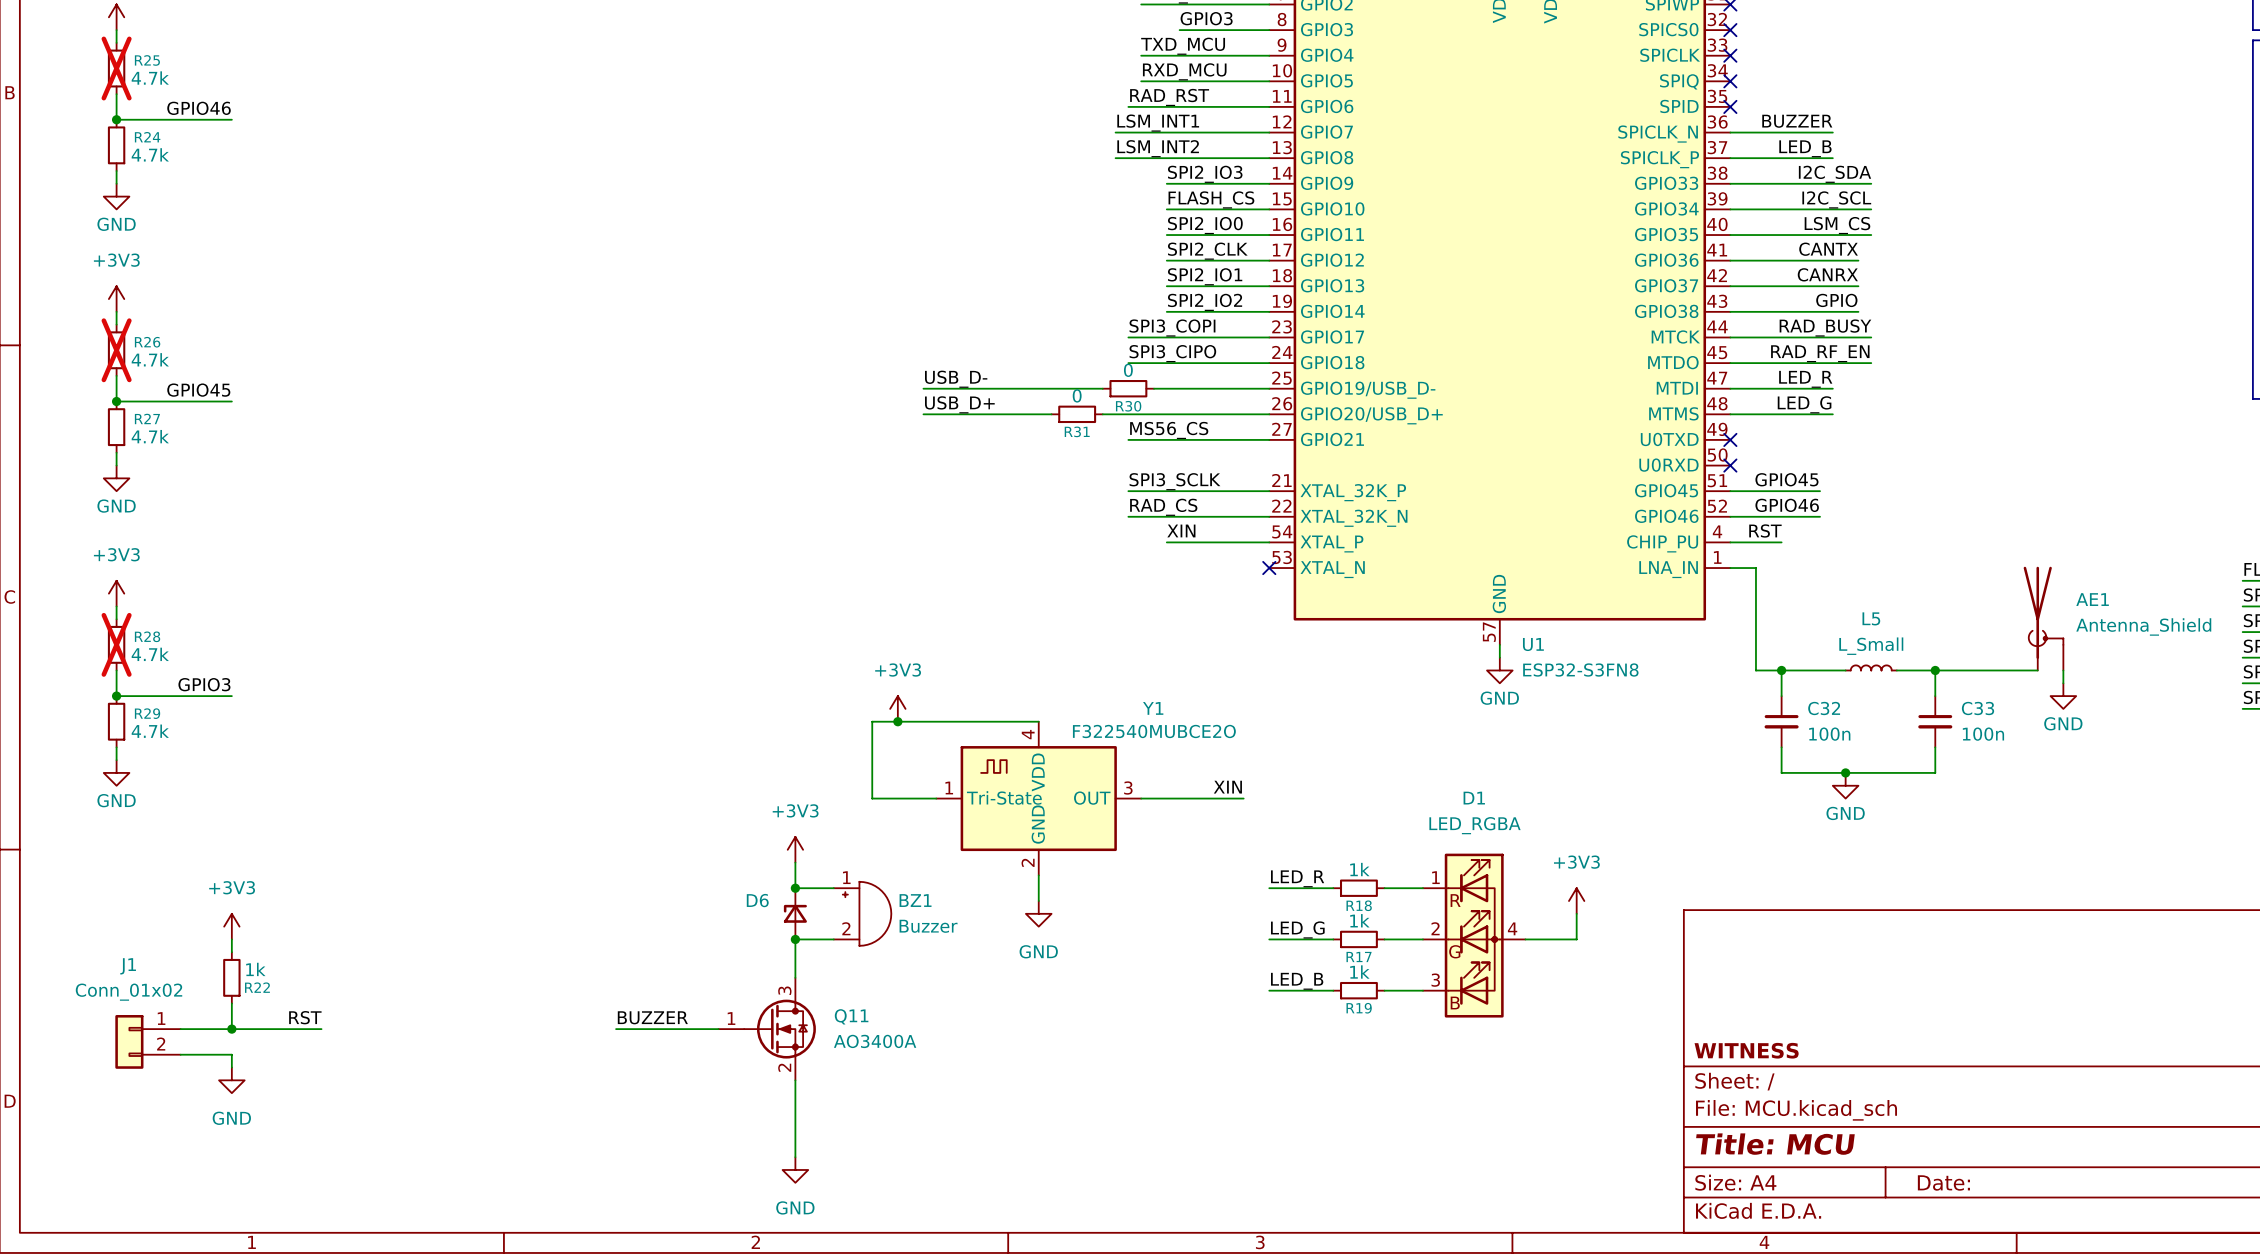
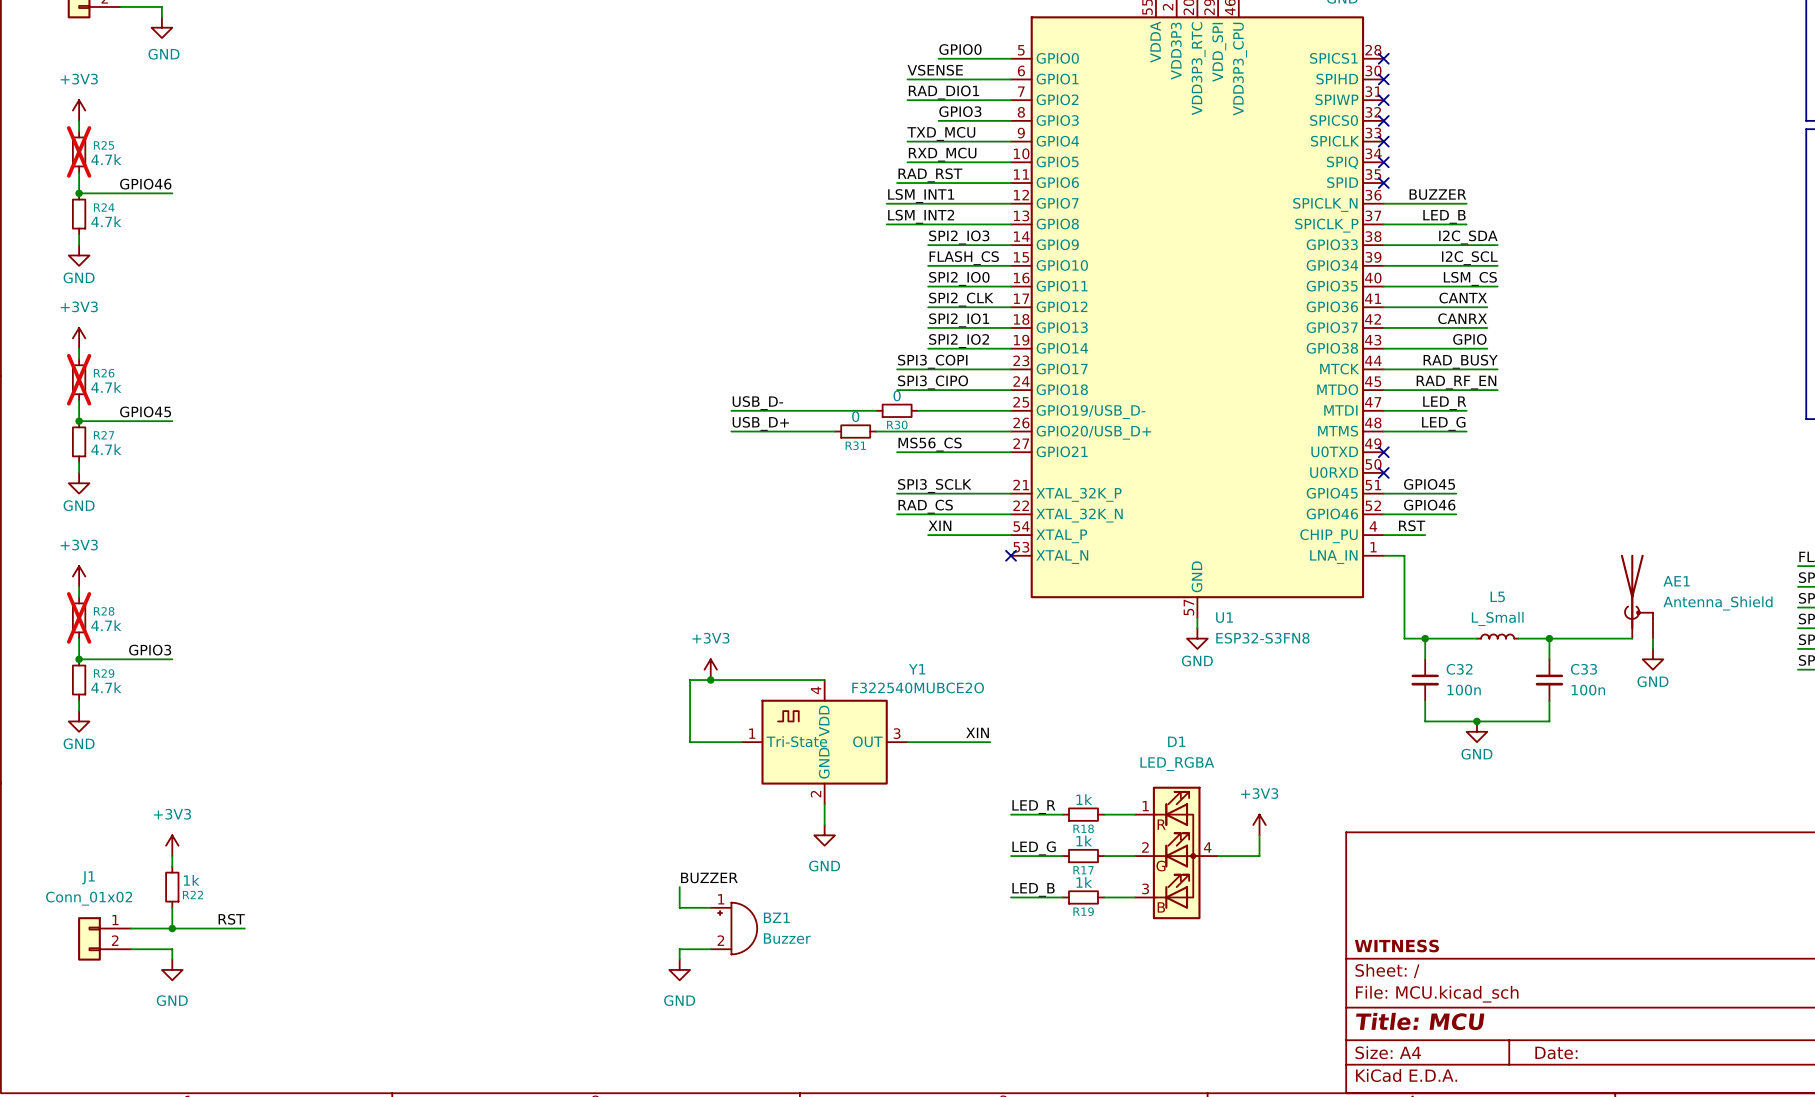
power symbol: +3V3 (795, 849) -> none
wire: (795, 862) (795, 888) (833, 888) -> (679, 887) (679, 907) (710, 907)
junction: (795, 888) -> none
D6: (795, 913) -> none
BZ1 position: (862, 913) -> (733, 928)
junction: (795, 939) -> none
wire: (833, 939) (795, 939) (795, 977) -> none
label position: BUZZER (652, 1017) -> BUZZER (709, 877)
wire: (616, 1029) (718, 1029) -> none
Q11: AO3400A (767, 1029) -> none
wire: none -> (710, 949) (679, 949) (679, 959)
wire: (795, 1080) (795, 1157) -> none
power symbol position: GND (795, 1169) -> GND (679, 969)

